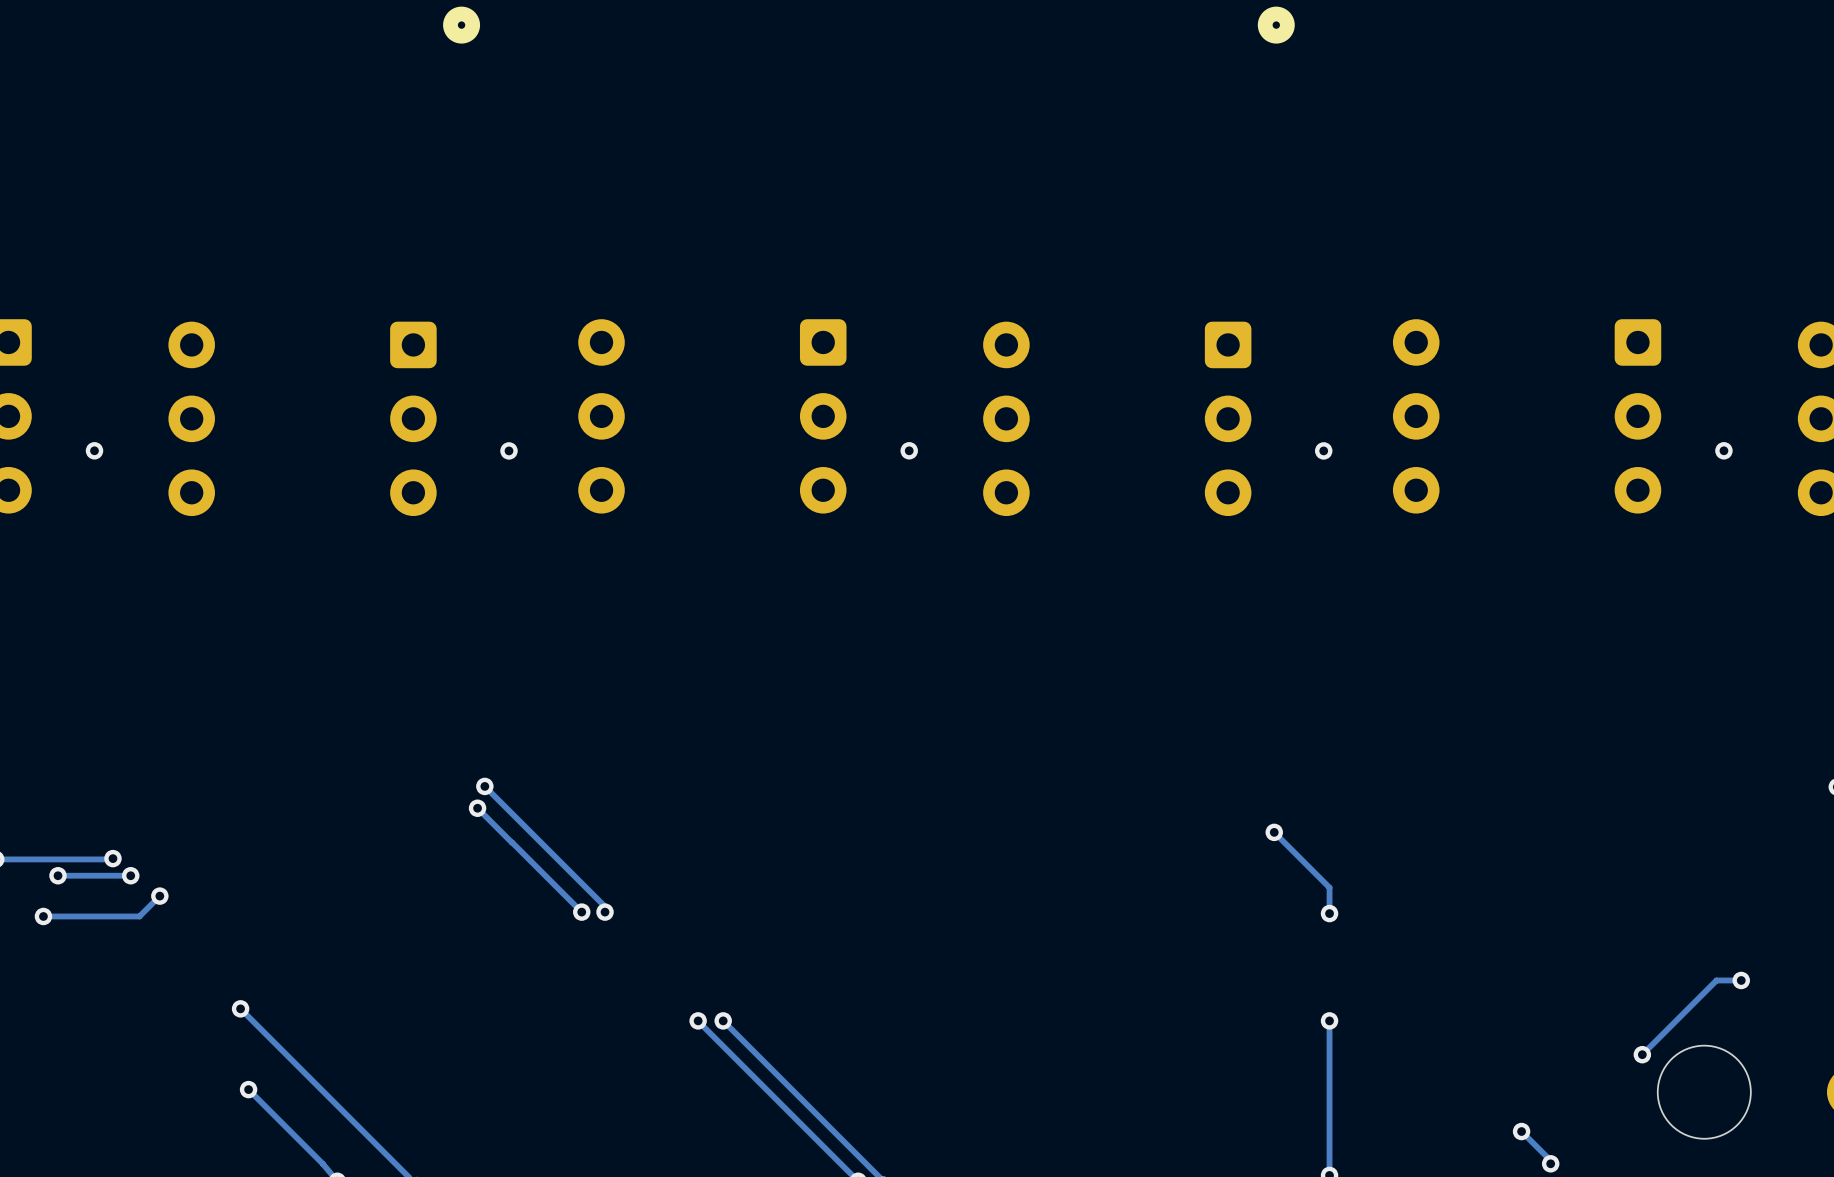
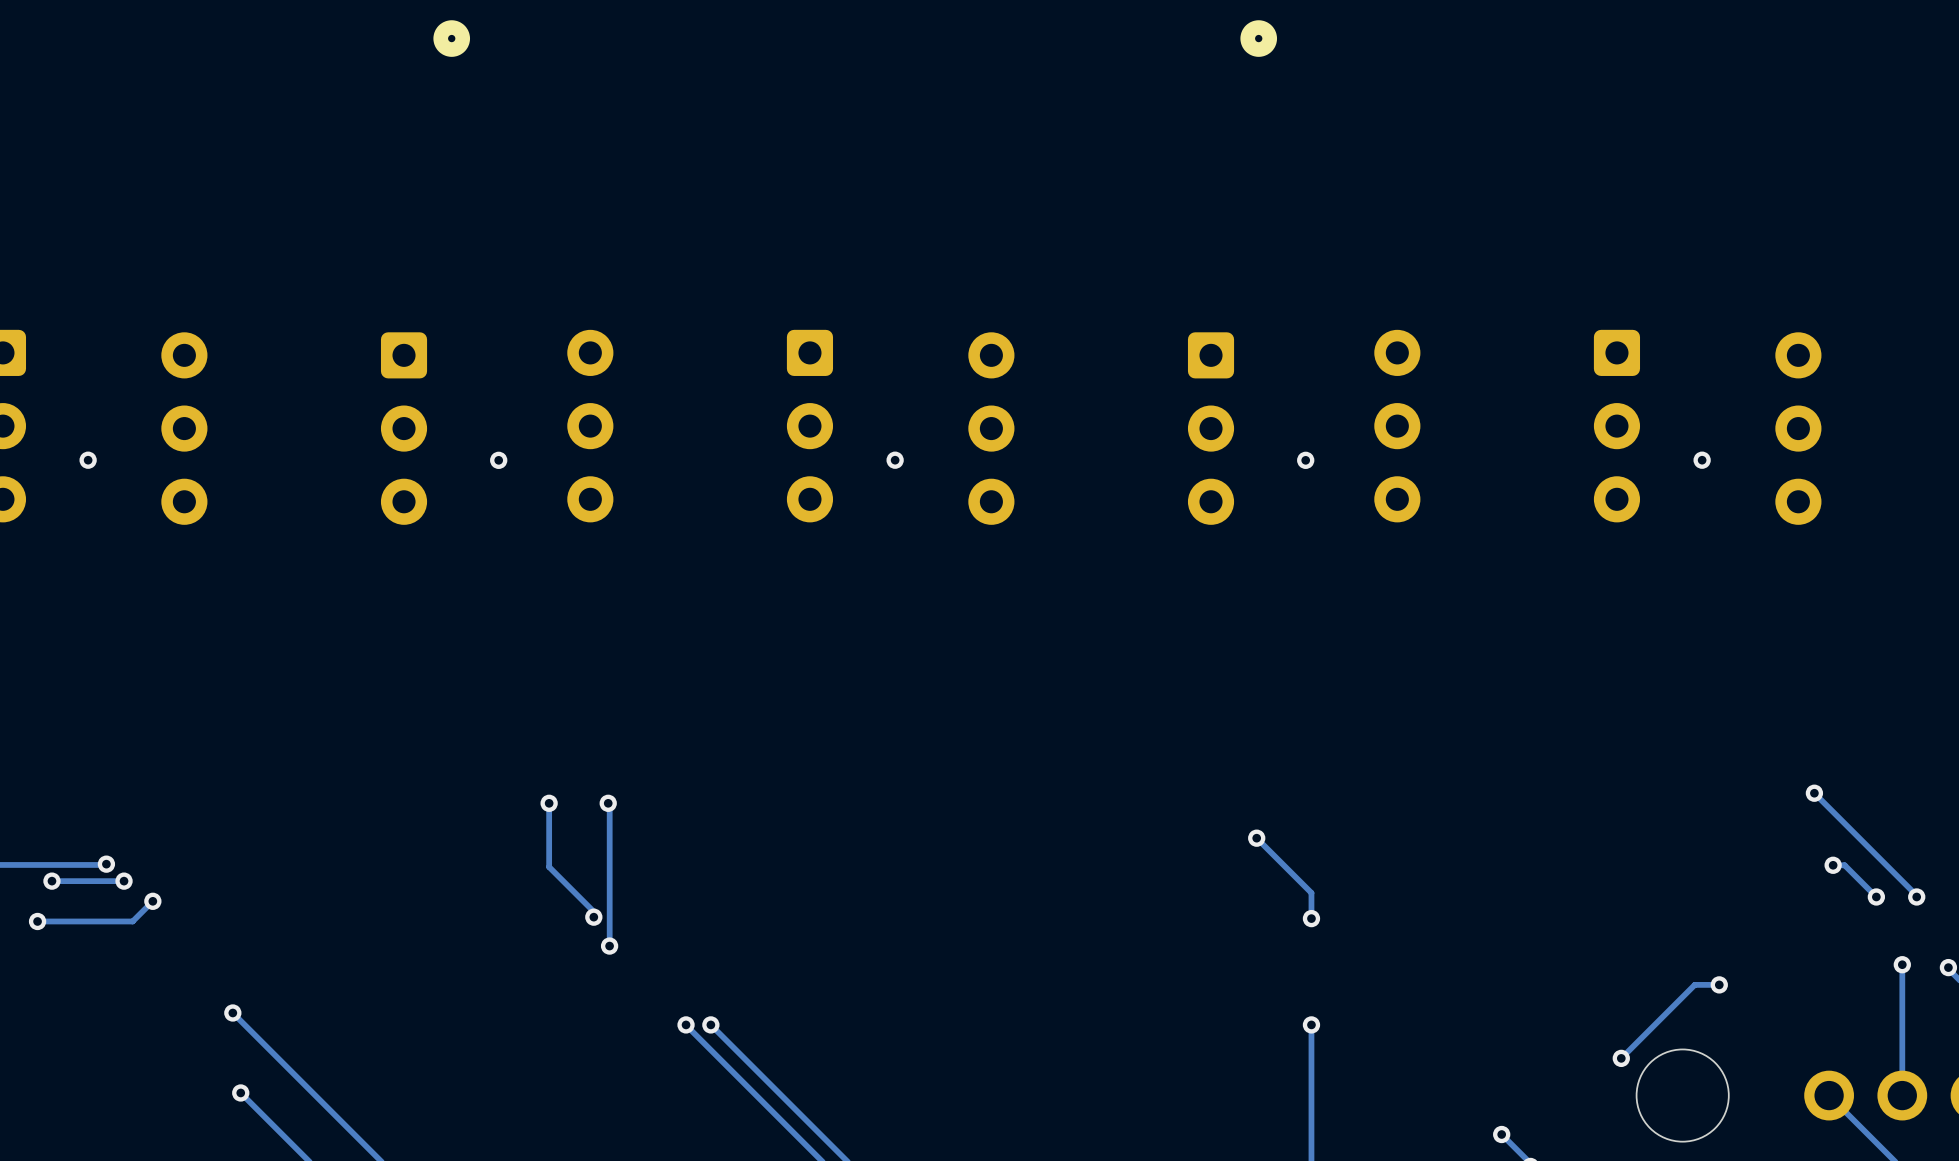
track: (484, 786) (559, 861) -> (549, 803) (549, 867)
via: (484, 786) -> none
via: none -> (549, 803)
track: none -> (608, 803) (609, 945)
via: none -> (608, 803)
track: (477, 808) (511, 842) -> none
via: (477, 808) -> none
track: (512, 842) (581, 912) -> none
via position: (581, 912) -> (609, 946)

